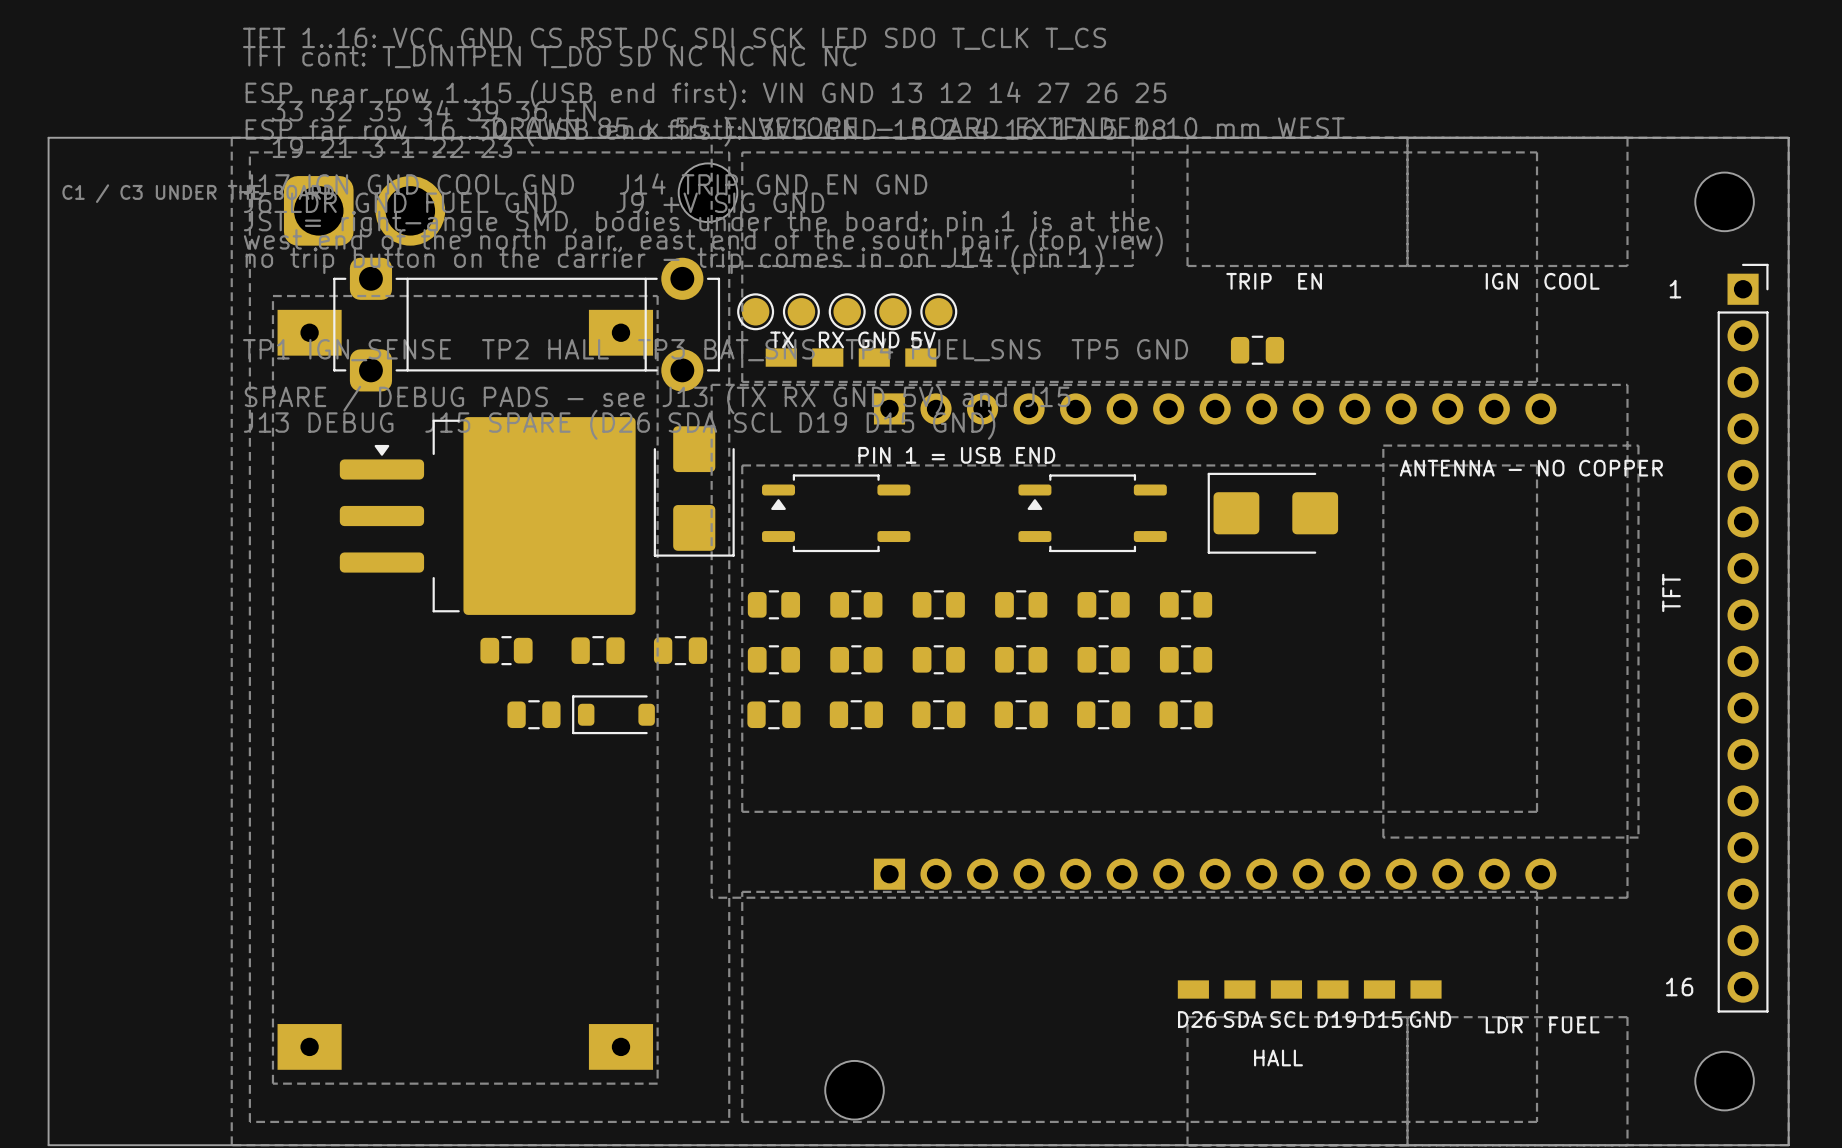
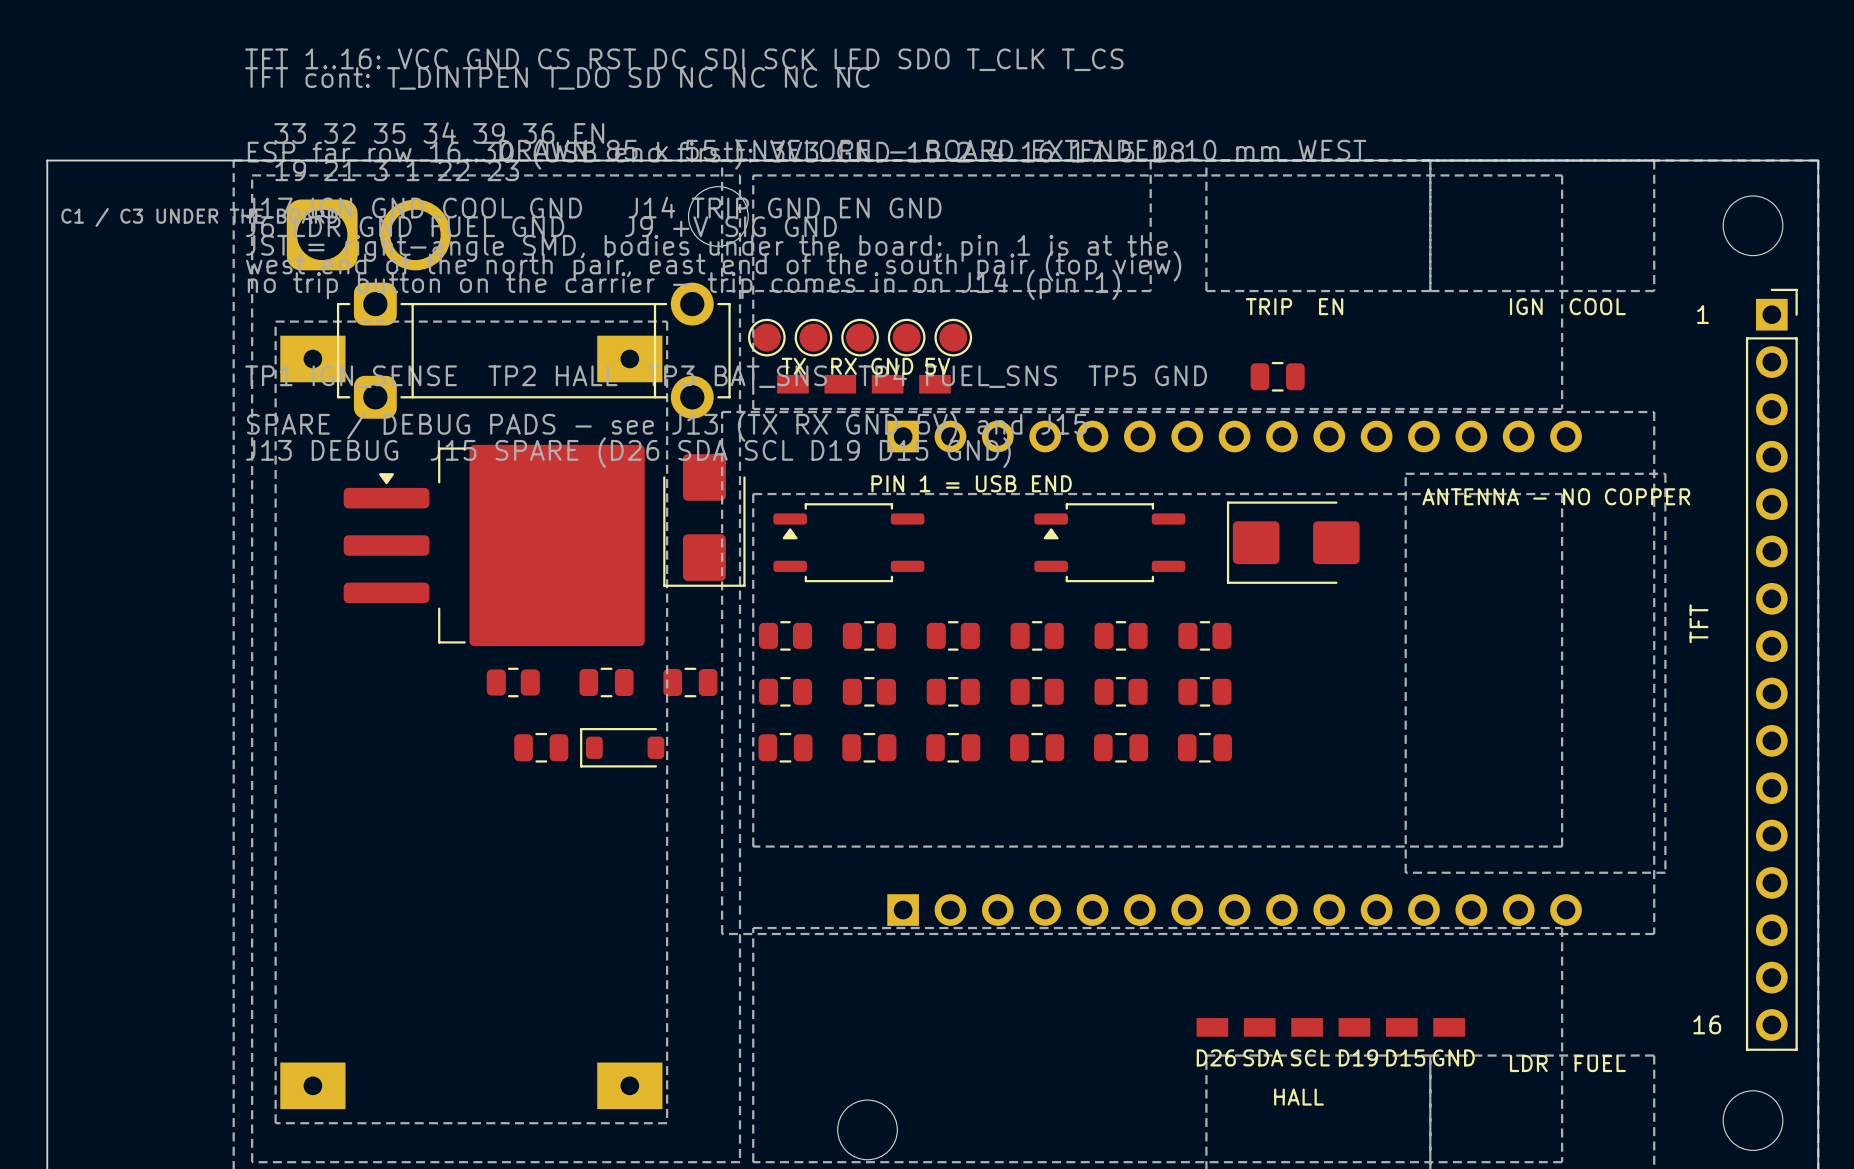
text: ESP near row 1..15 (USB end first): VIN GND 13 12 14 27 26 25 (705, 95) -> none

